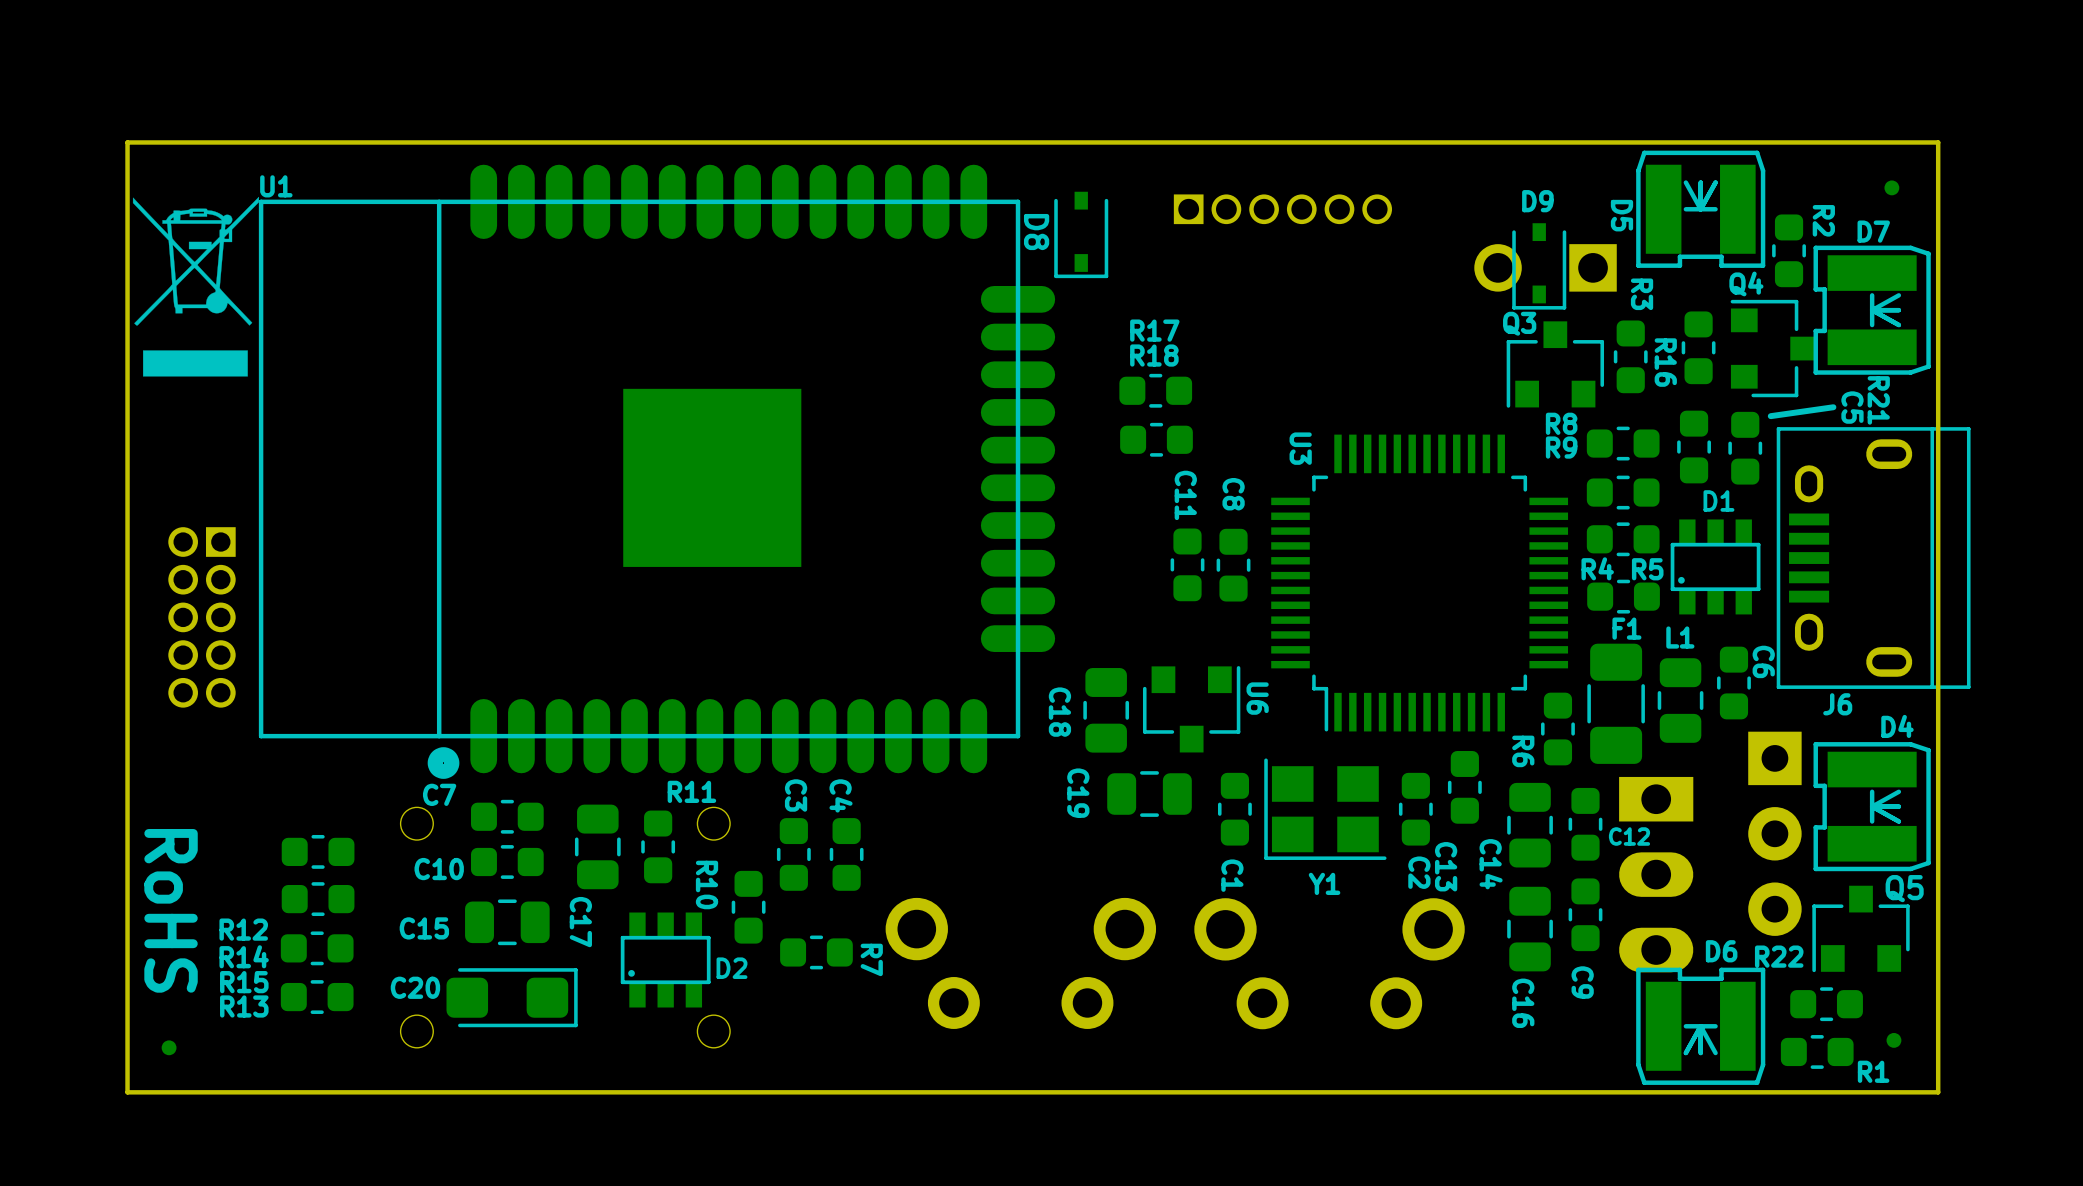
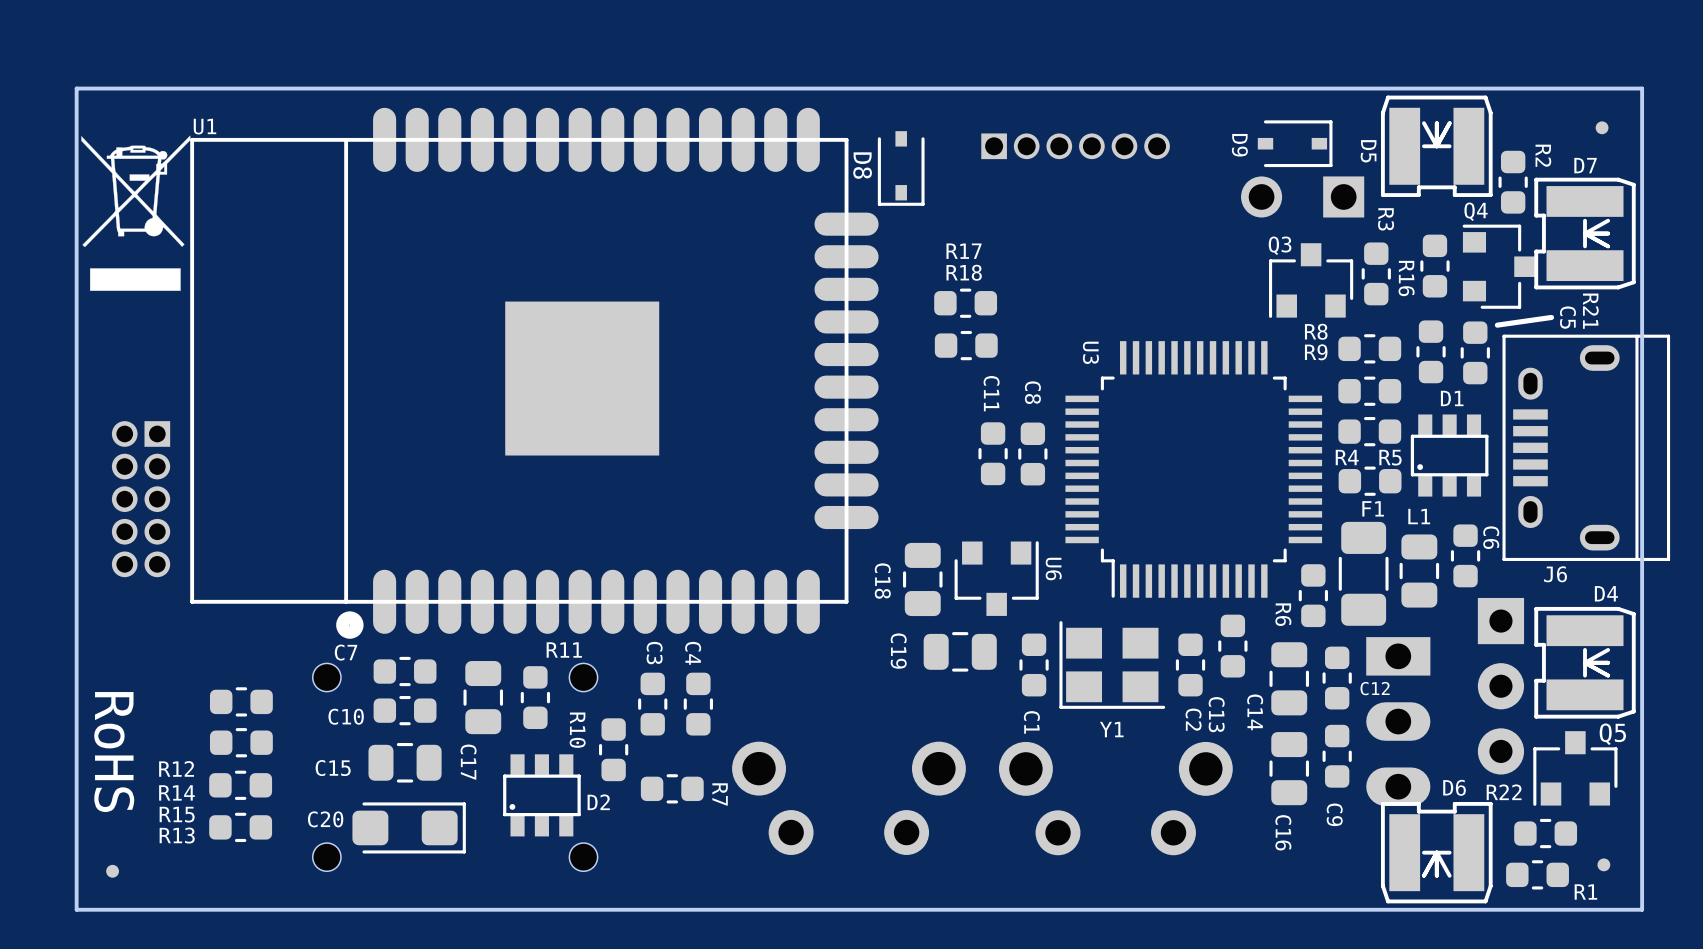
D9 rotation: 0° (1539, 266) -> 90° counterclockwise (1295, 143)
D9 position: (1539, 266) -> (1295, 143)

